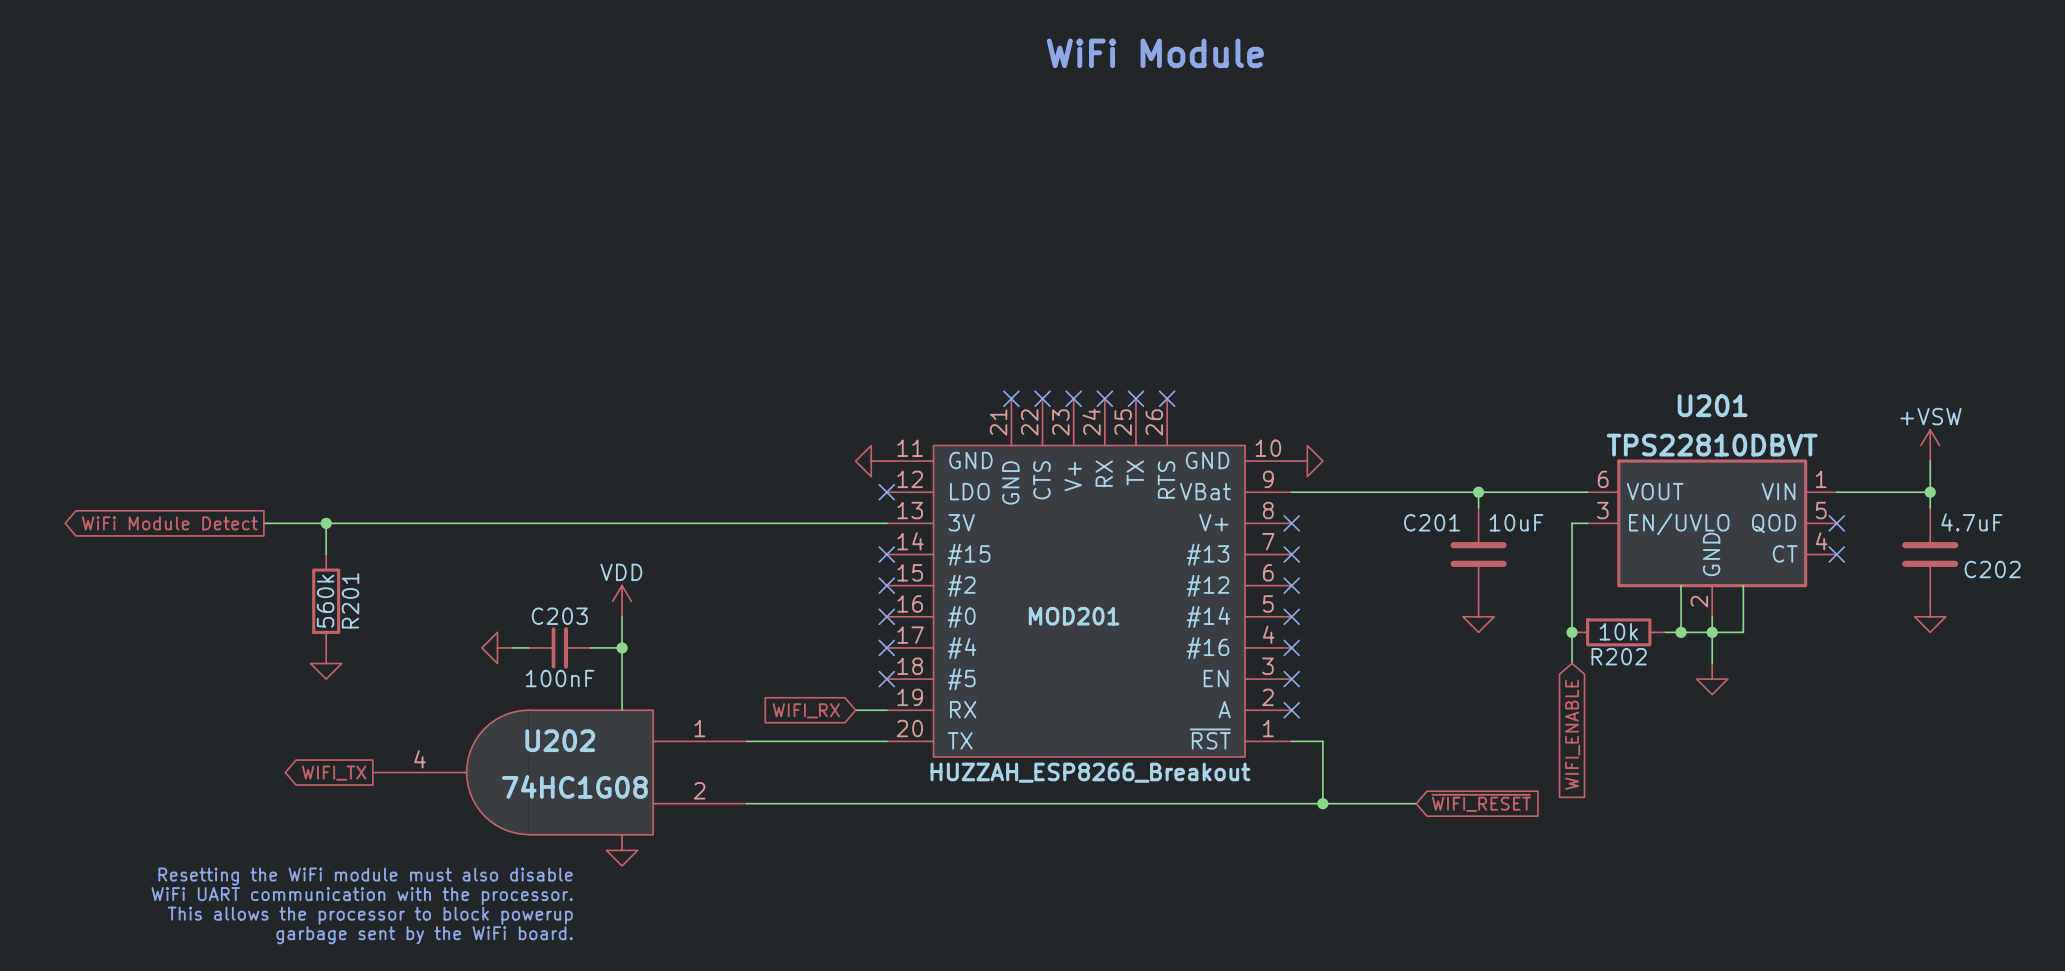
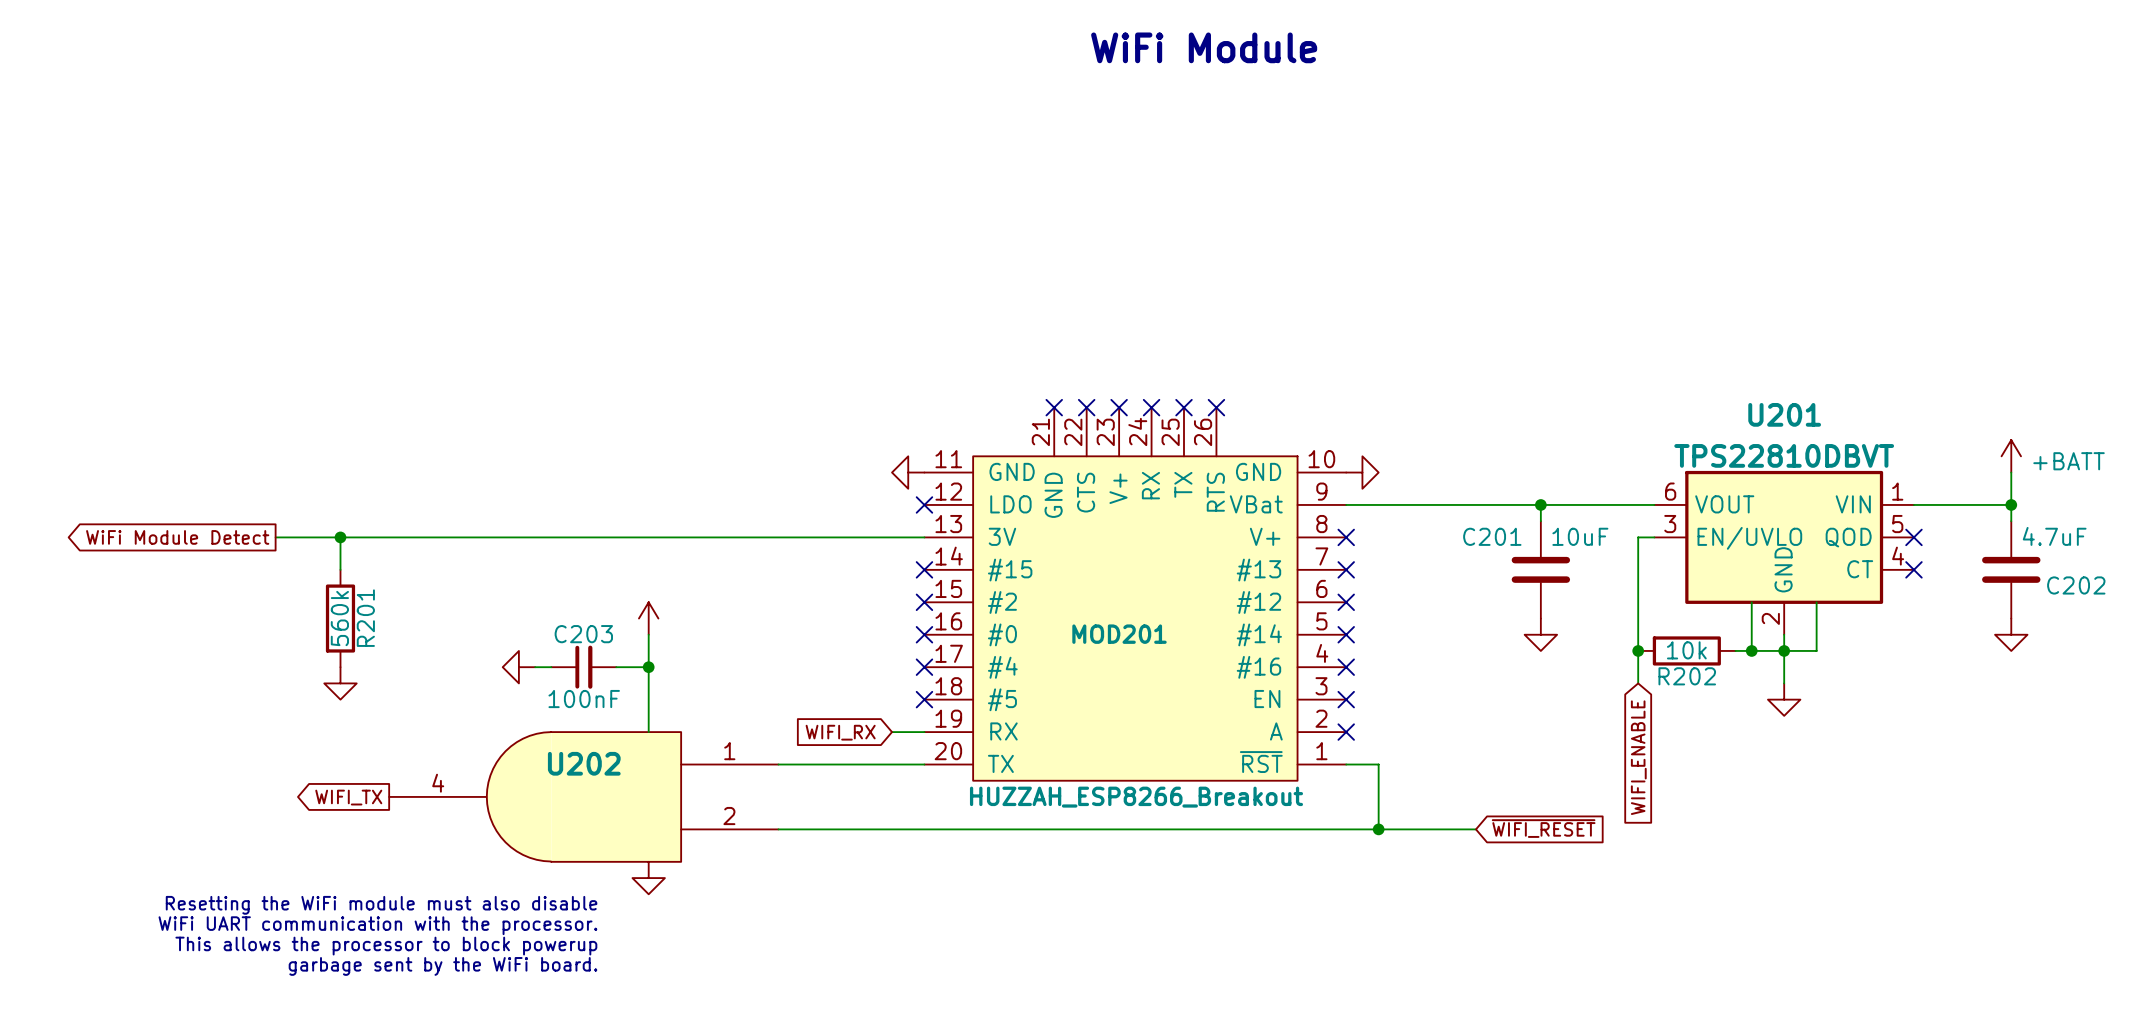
power symbol: +VSW (1930, 445) -> +BATT (2011, 456)
power symbol text: VDD (621, 572) -> none
U202 value: 74HC1G08 (574, 786) -> none

